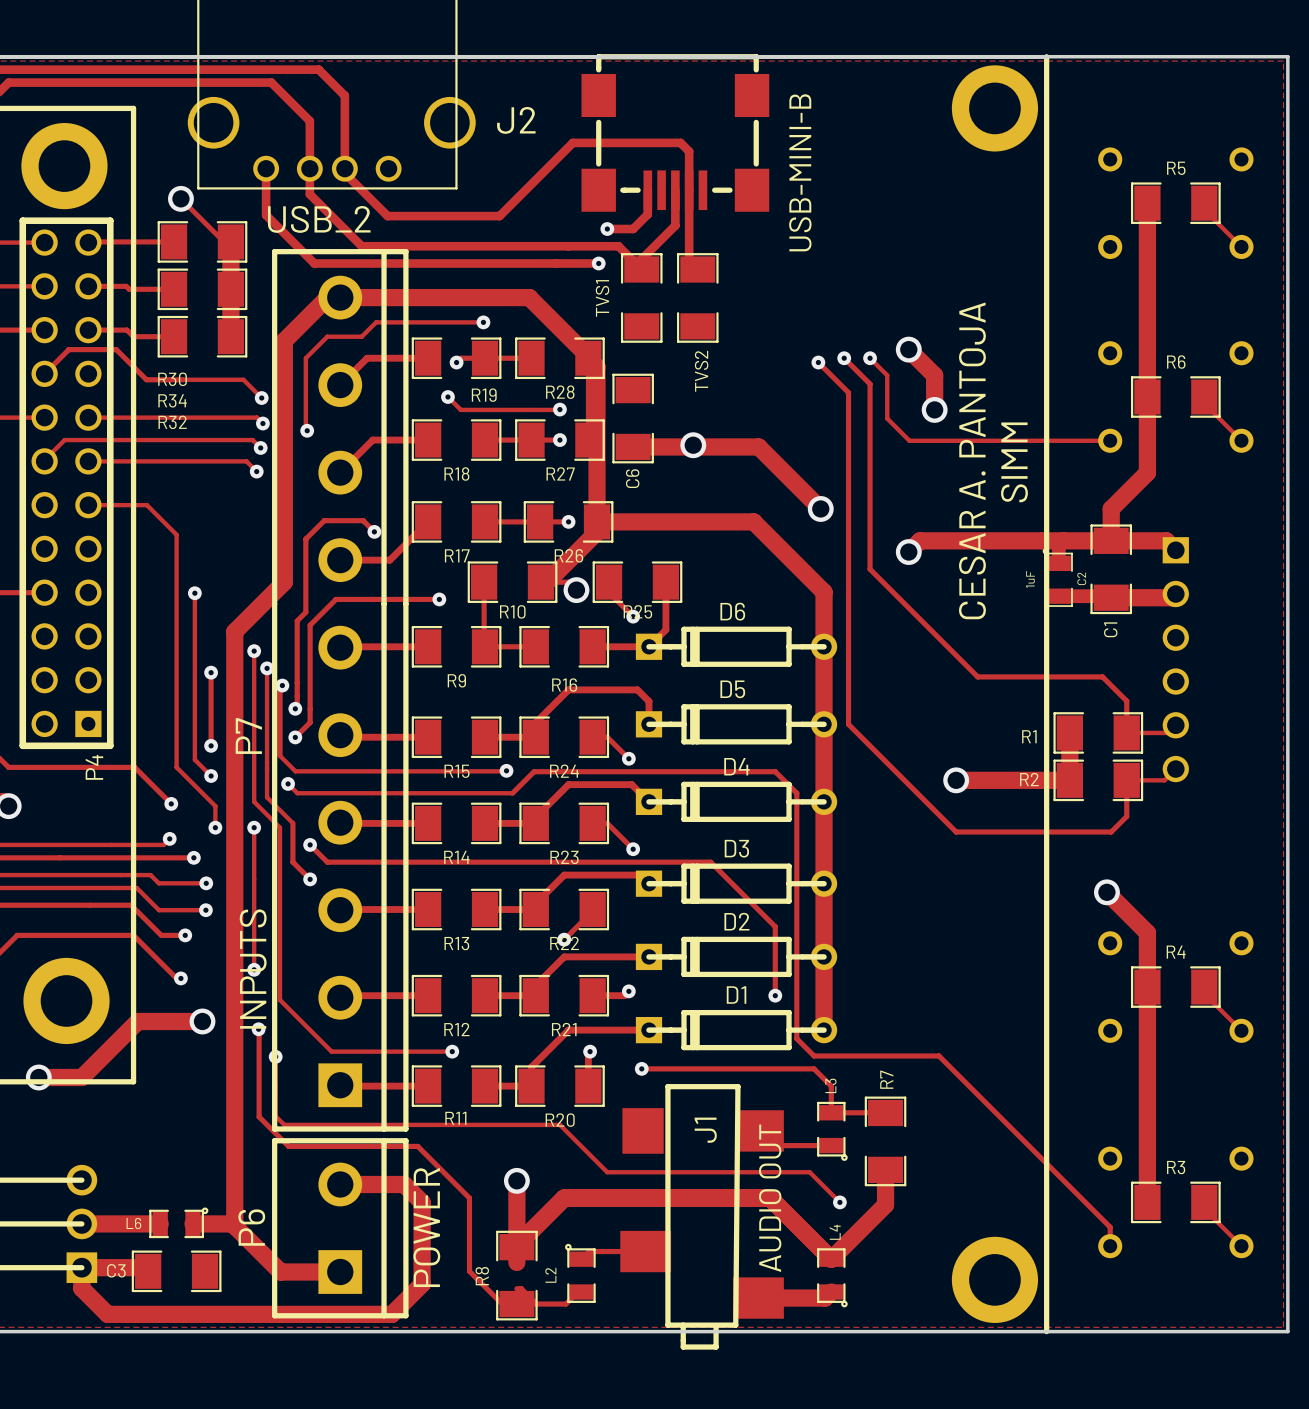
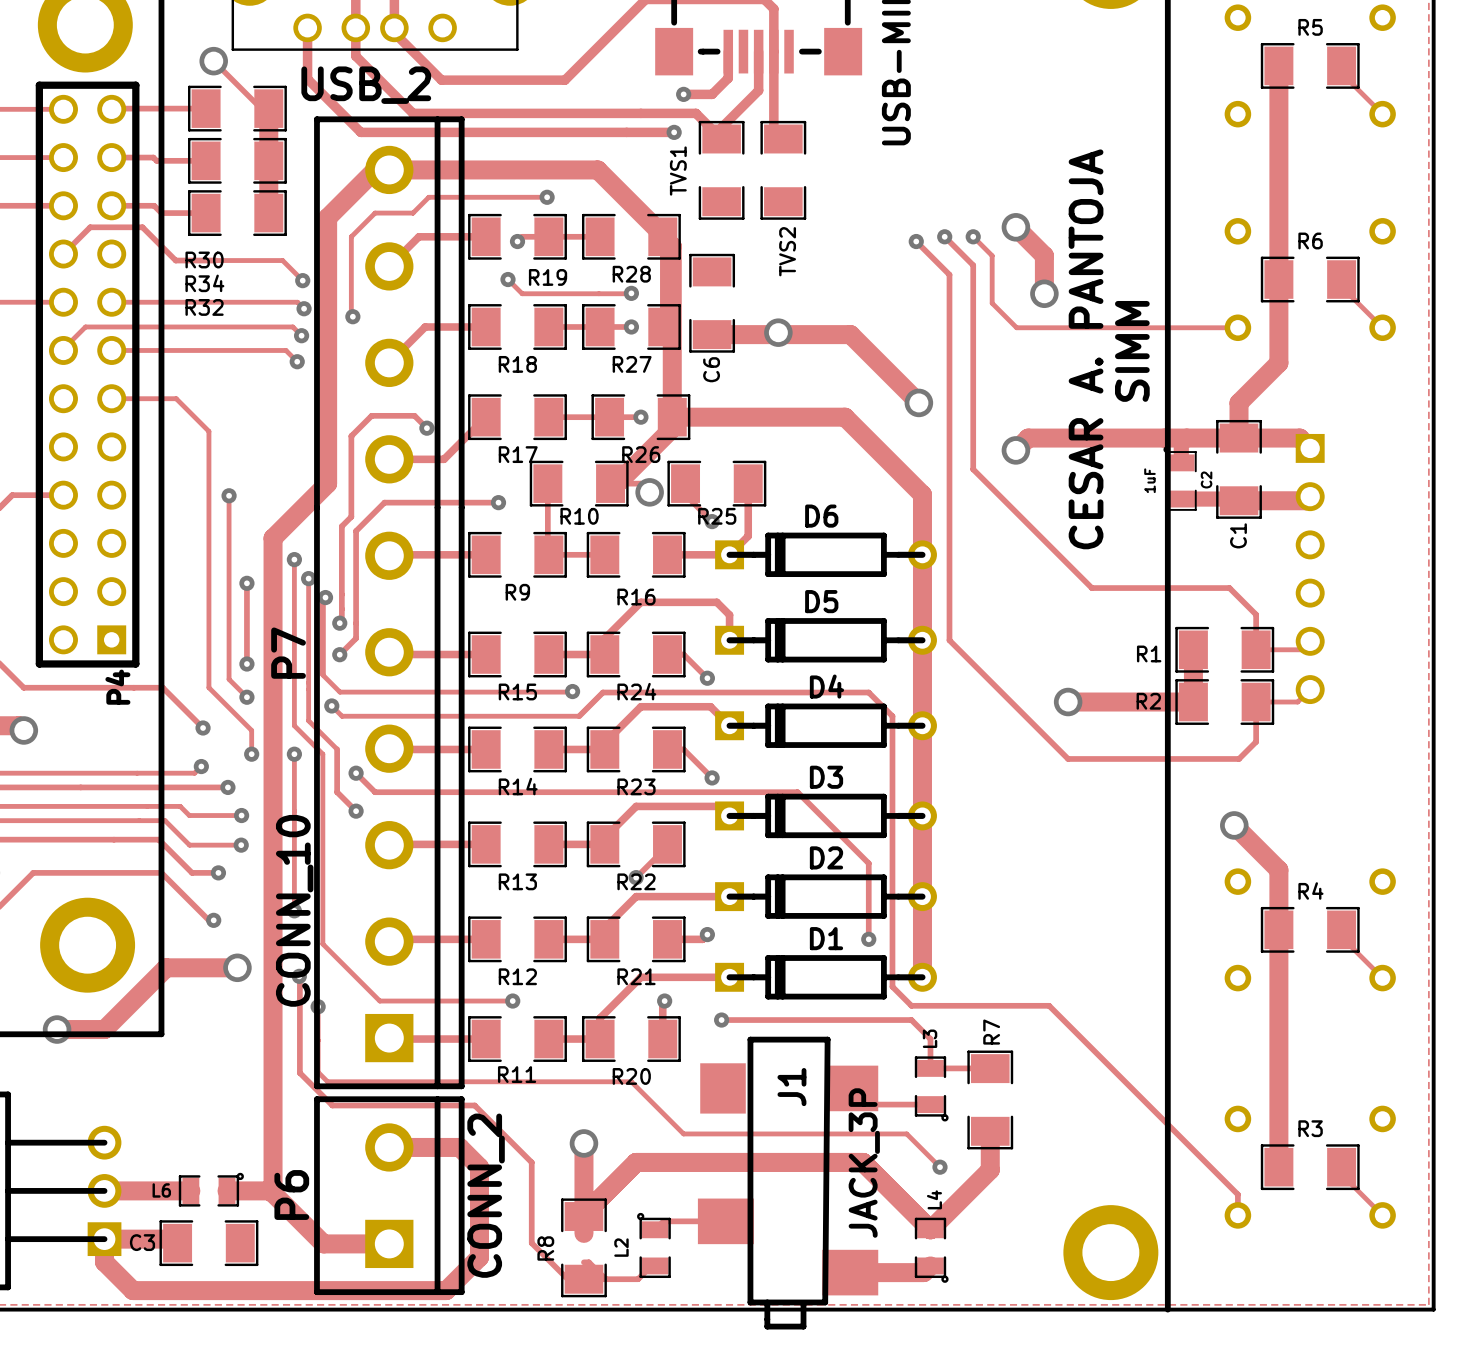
P7 value: INPUTS (253, 969) -> CONN_10 (294, 910)
J1 value: AUDIO OUT (770, 1198) -> JACK_3P (864, 1163)
P6 value: POWER (426, 1227) -> CONN_2 (486, 1195)

